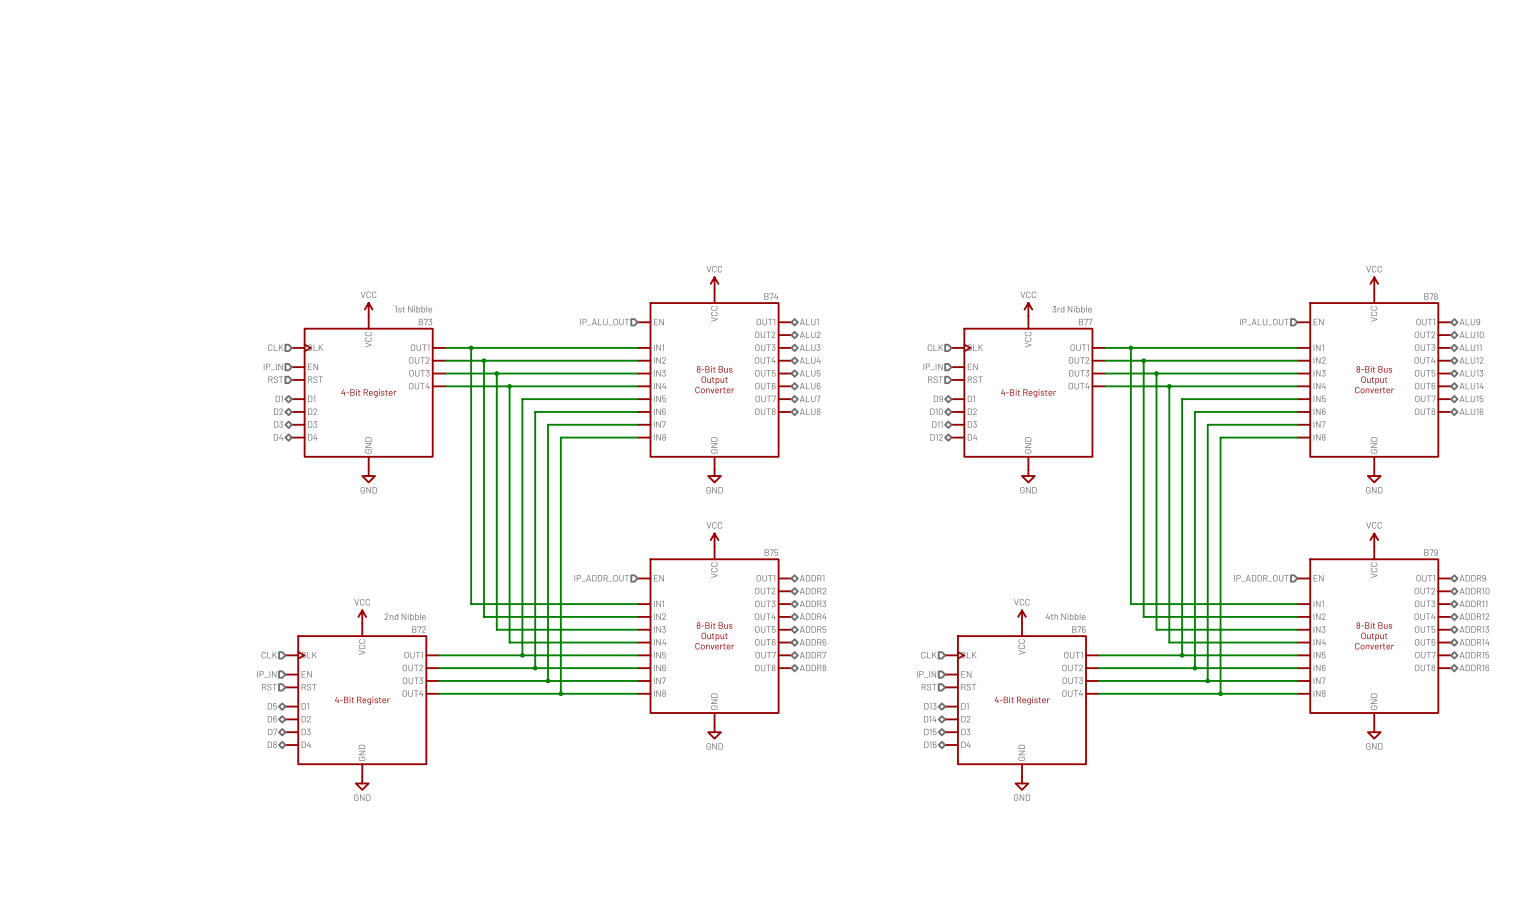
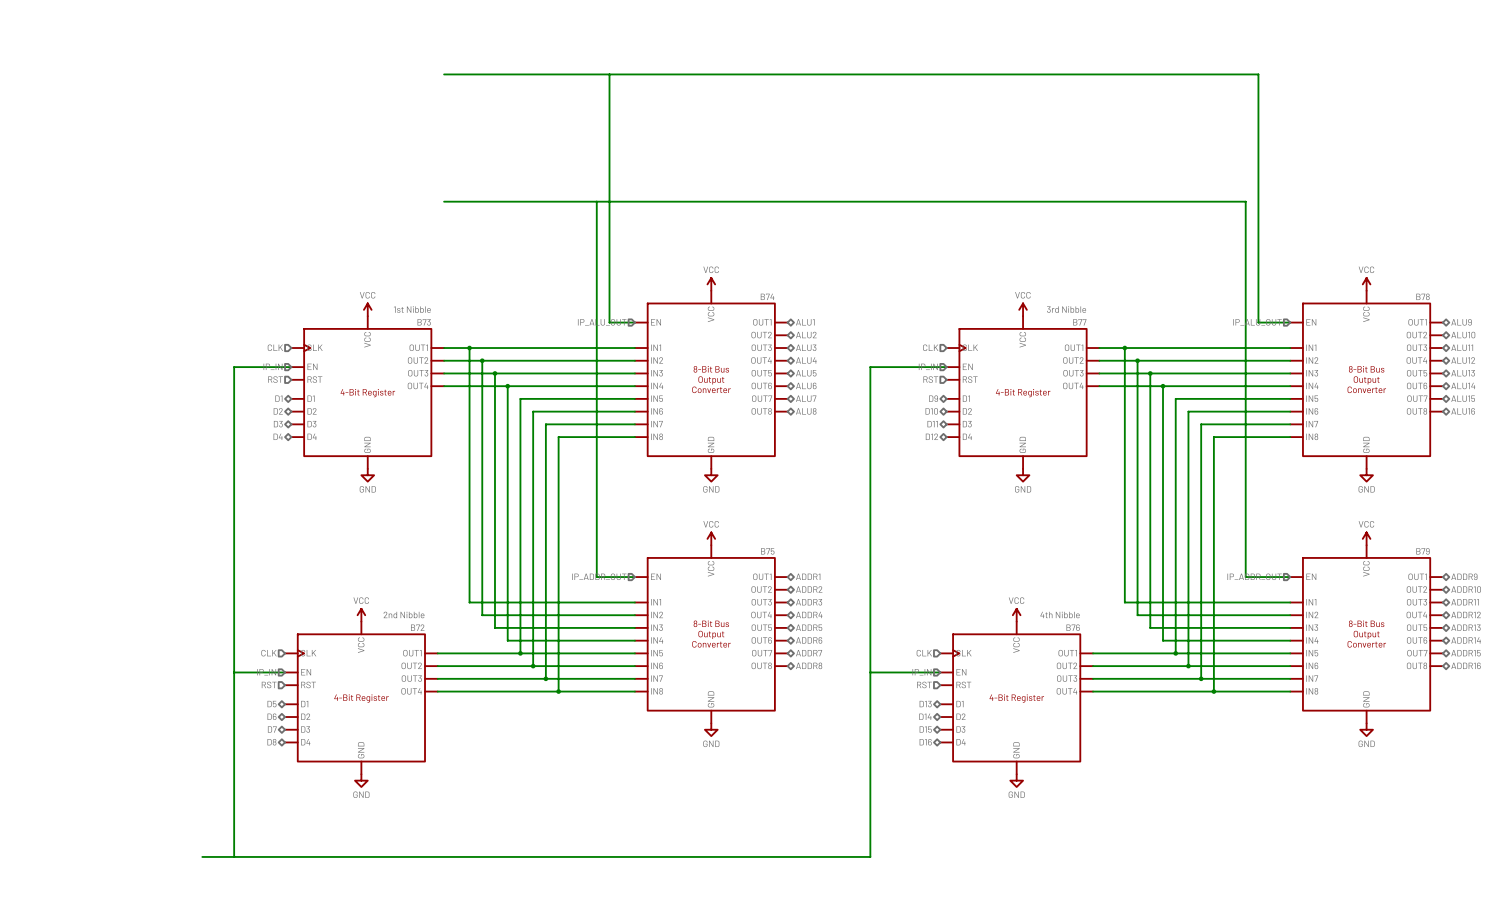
wire: none -> (444, 74) (1258, 74) (1258, 322) (1290, 322)
wire: none -> (609, 74) (609, 322) (634, 322)
wire: none -> (444, 201) (1245, 201) (1245, 577) (1290, 577)
wire: none -> (596, 201) (596, 577) (634, 577)
wire: none -> (291, 367) (234, 367) (234, 856)
wire: none -> (946, 367) (870, 367) (870, 856) (202, 856)
wire: none -> (234, 672) (285, 672)
wire: none -> (870, 672) (940, 672)

